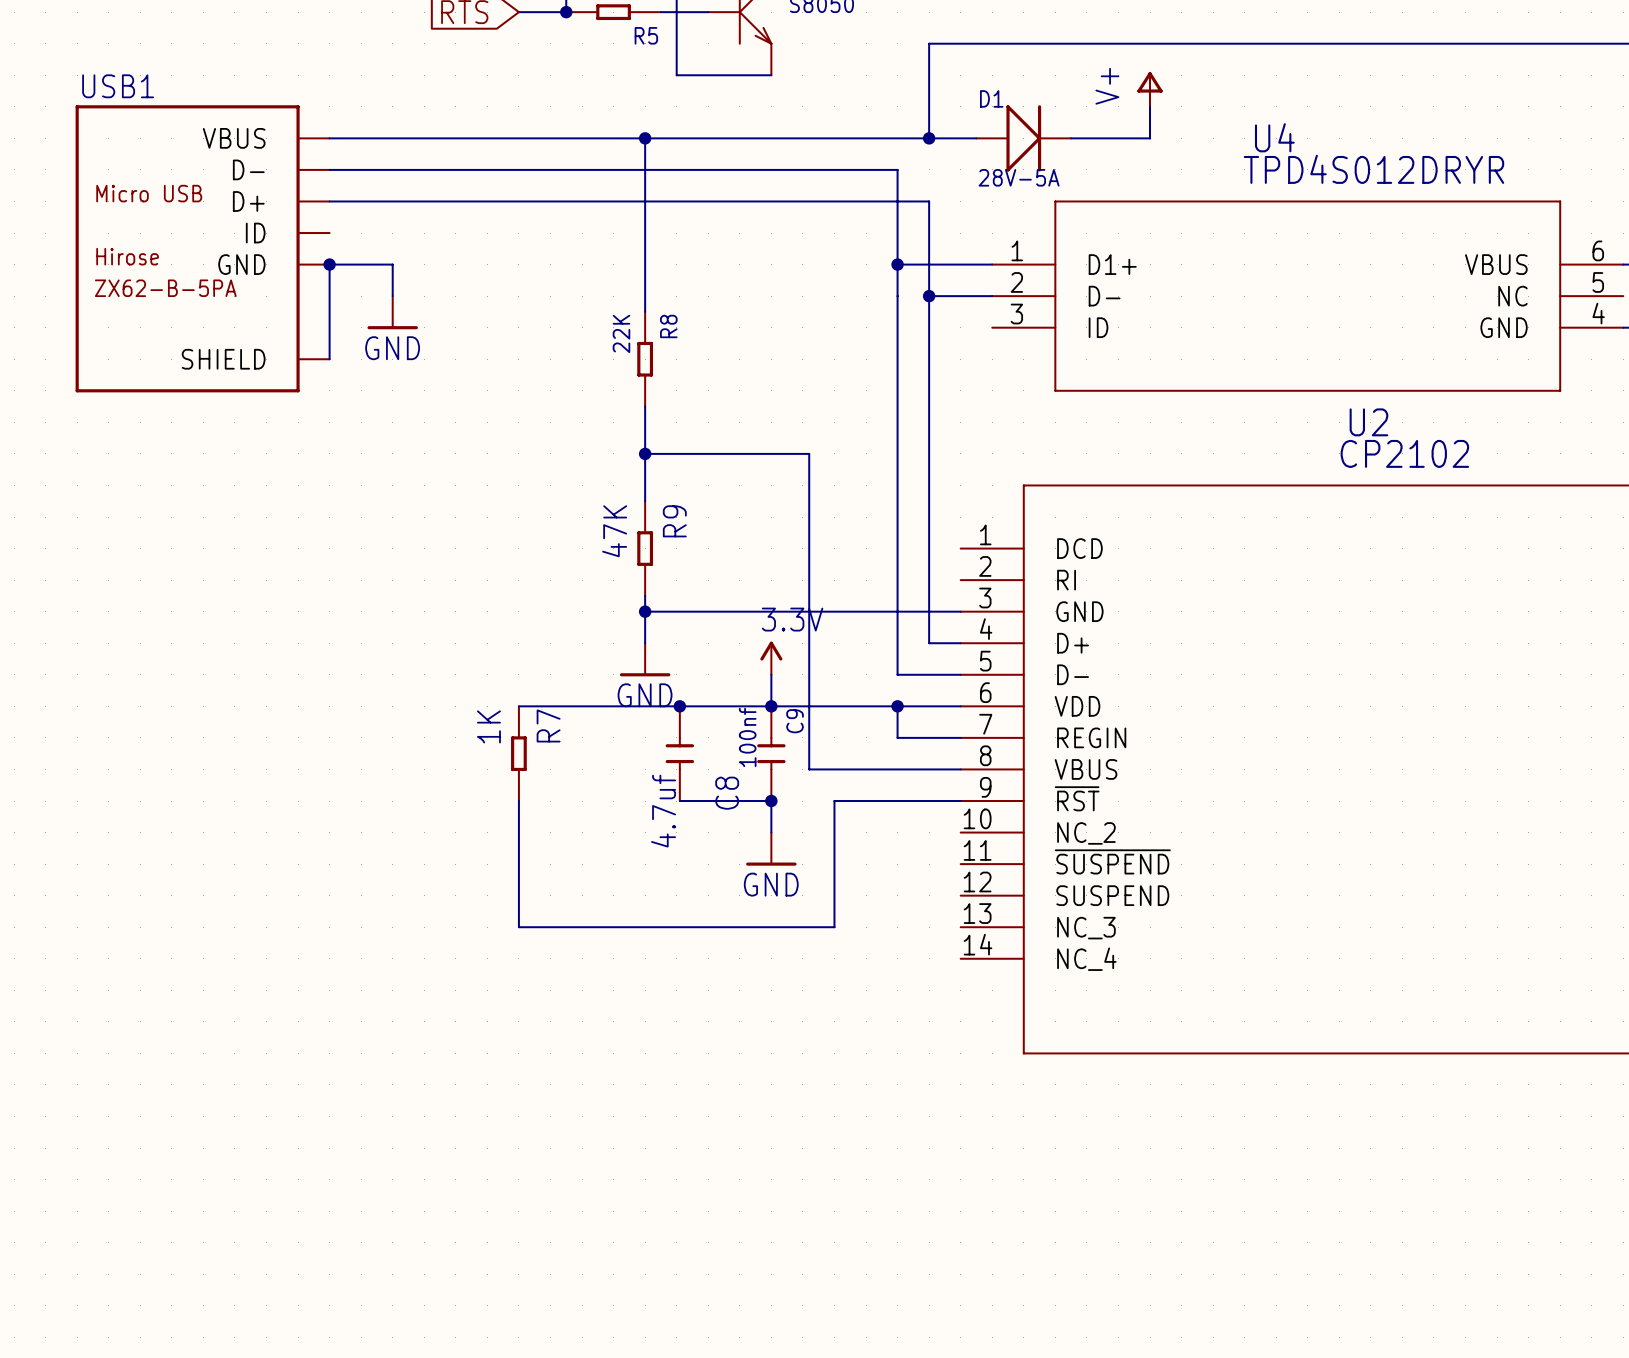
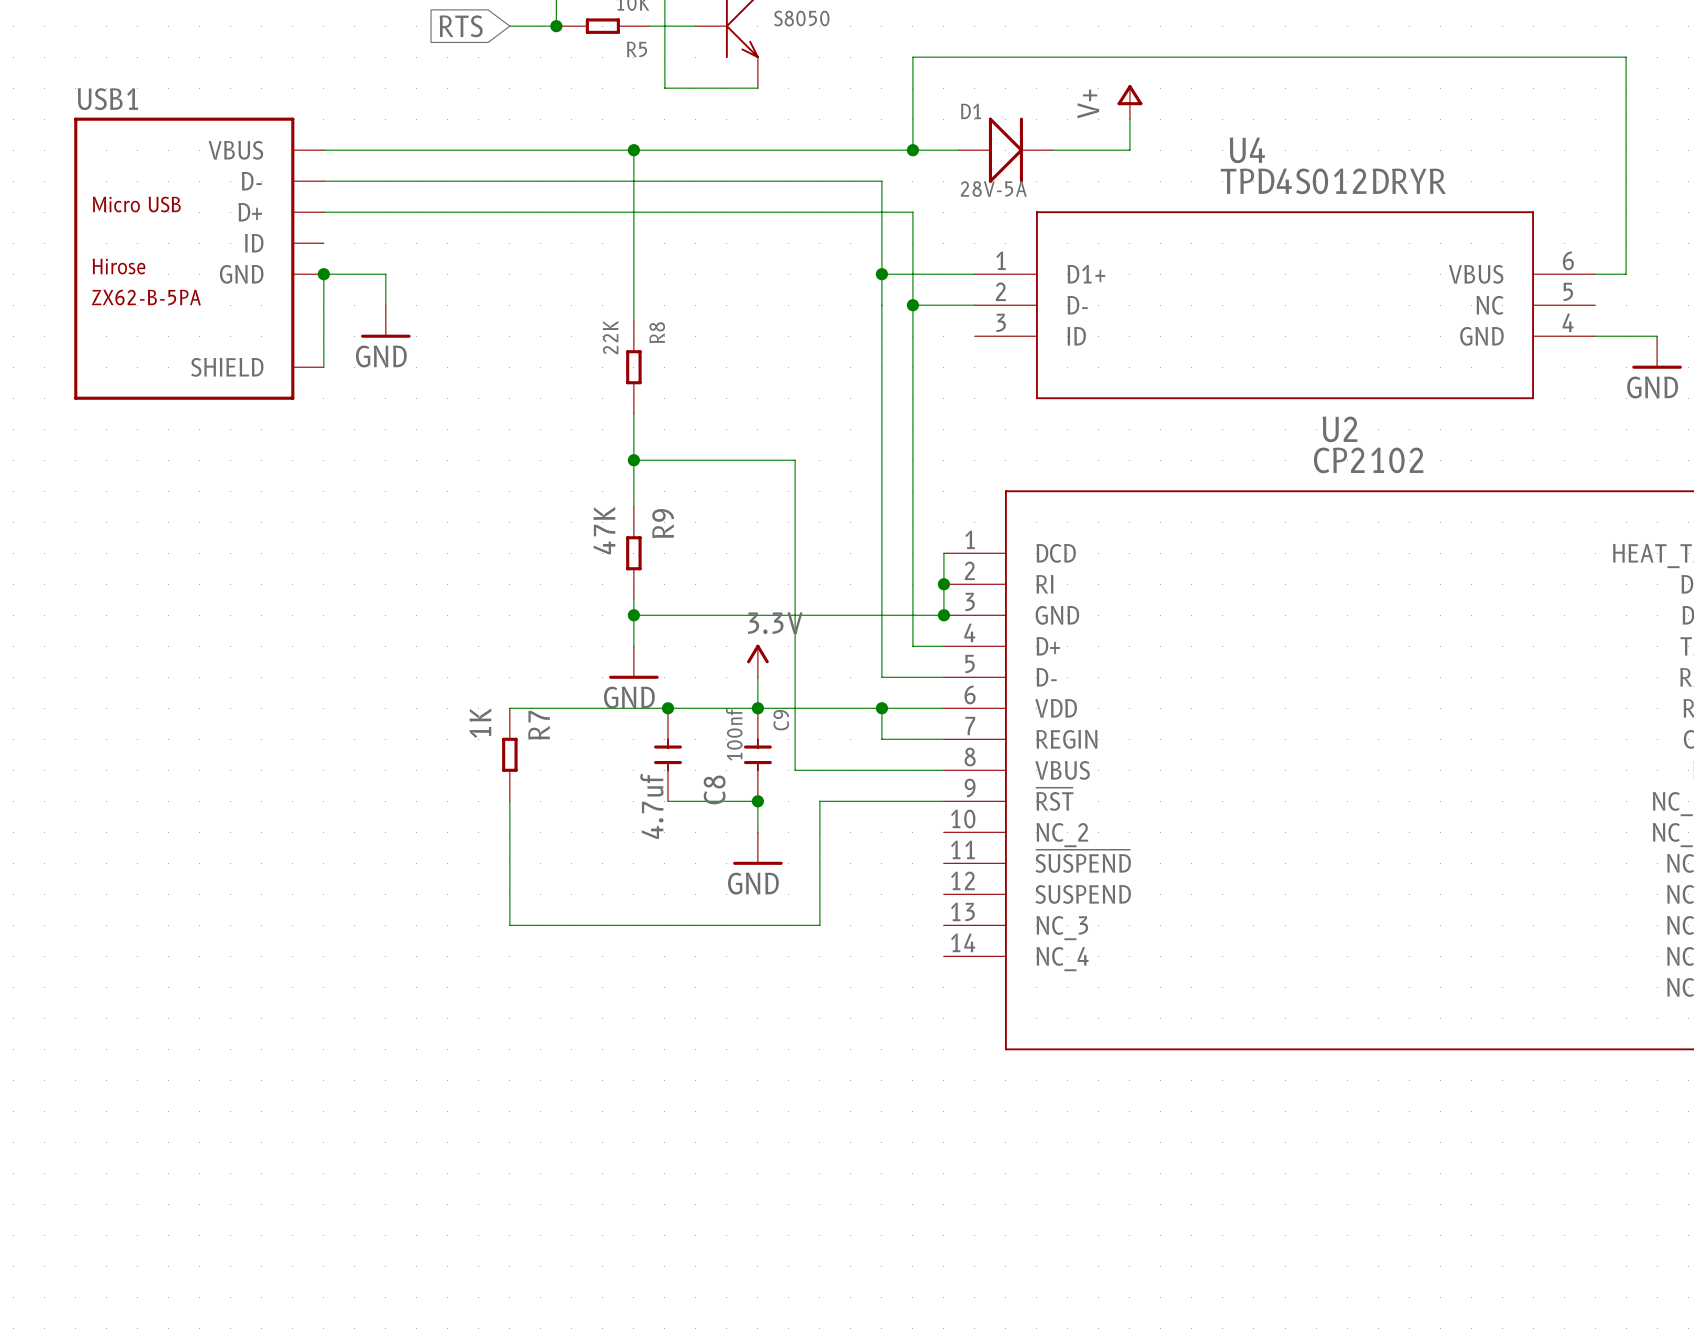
wire: none -> (943, 553) (943, 615)
junction: none -> (943, 584)
junction: none -> (943, 615)

